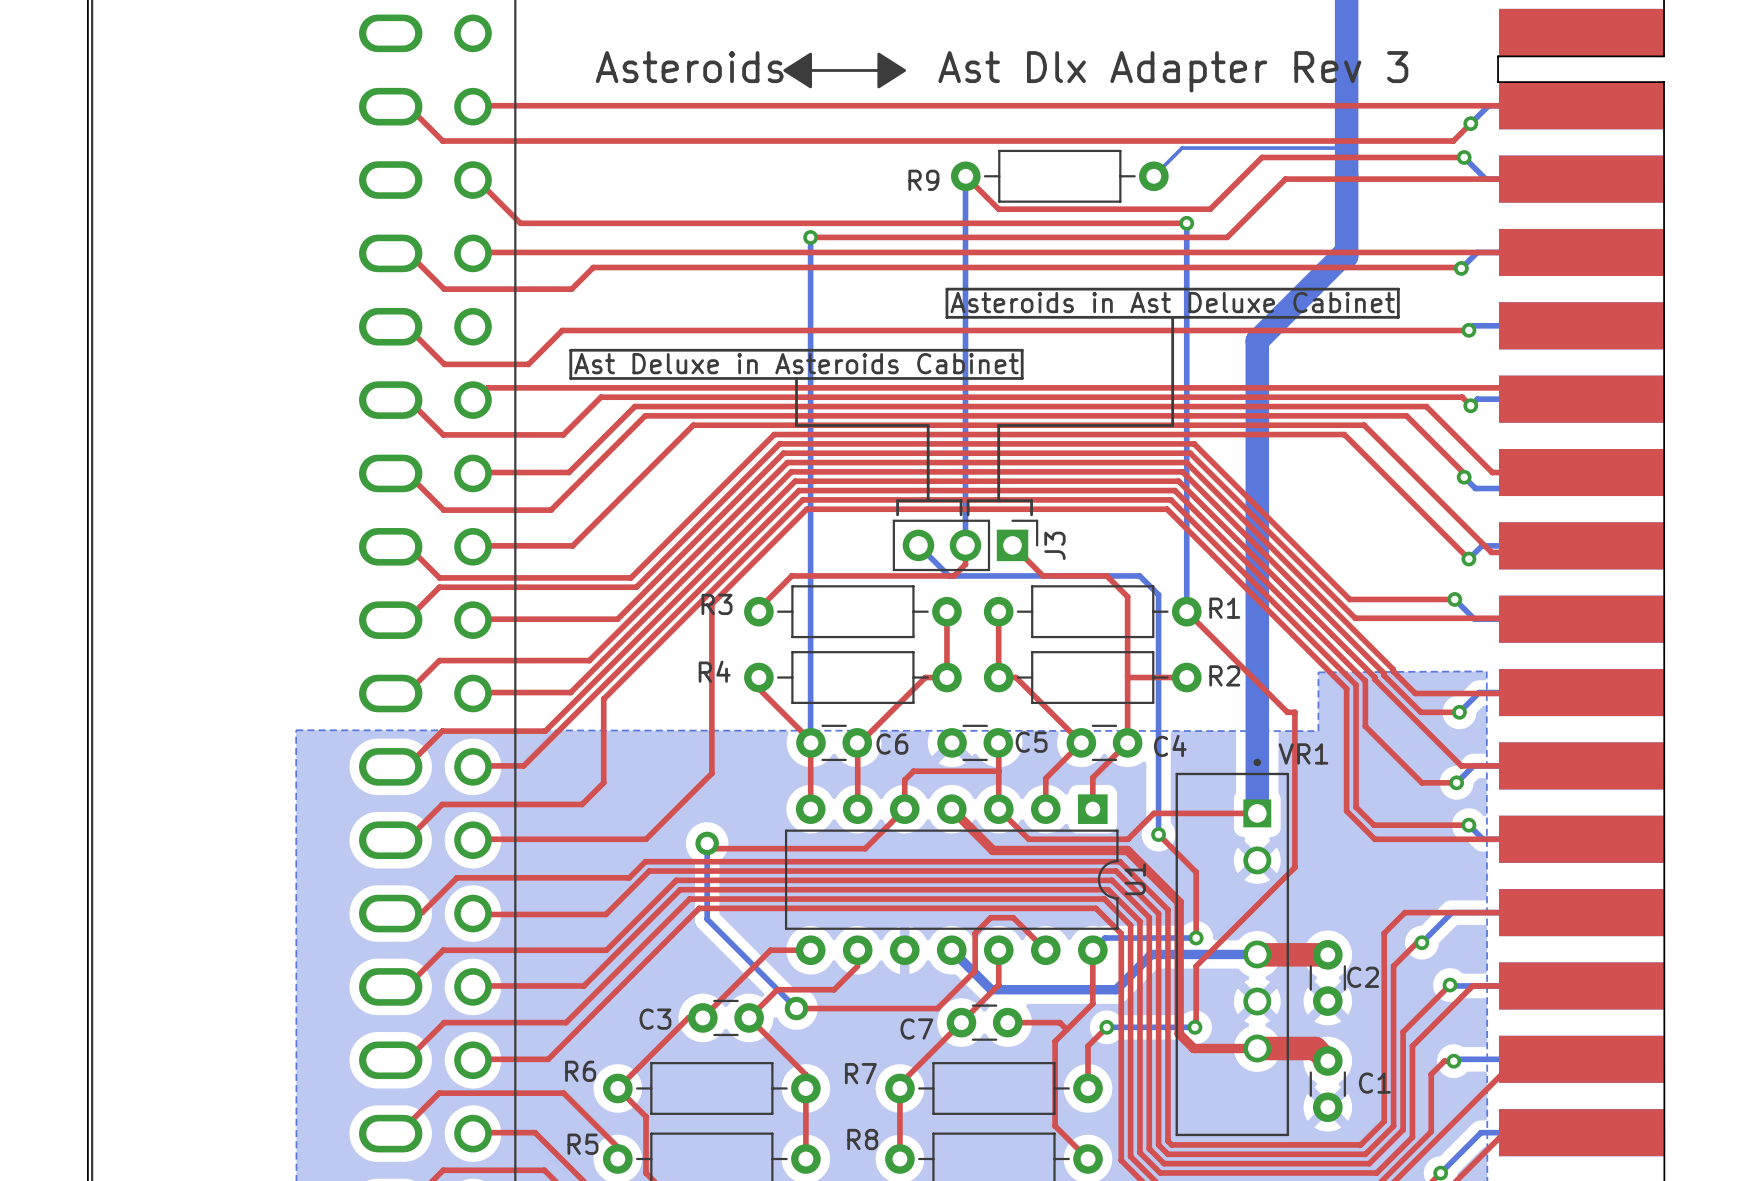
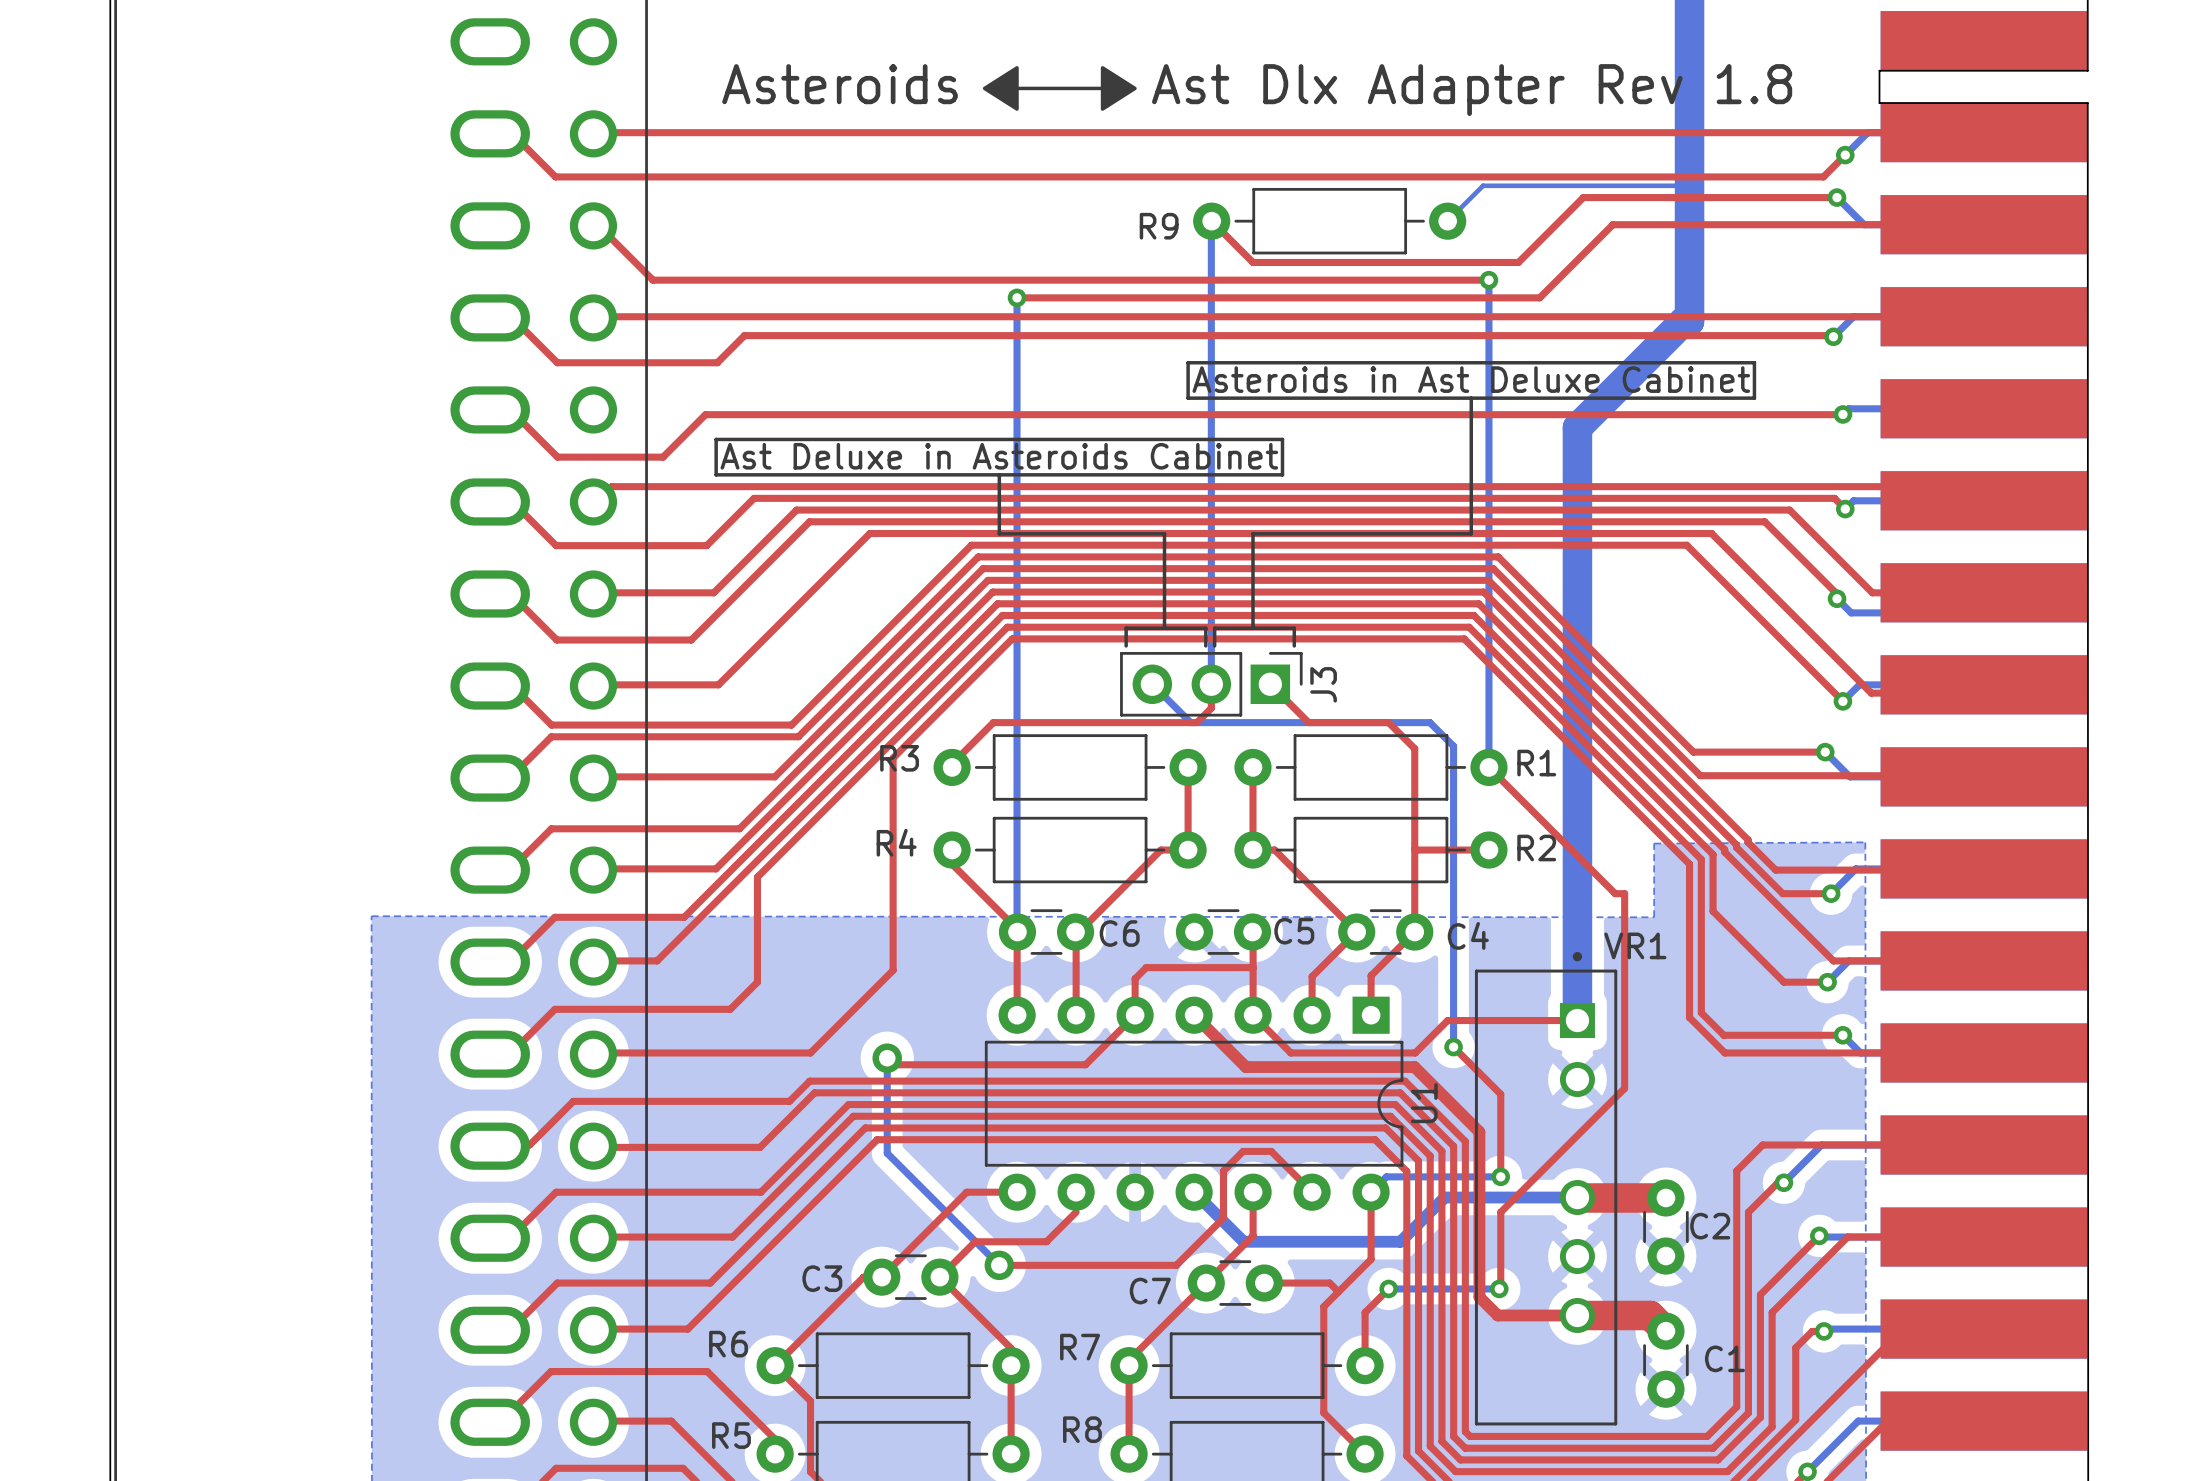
text: Asteroids Ast Dlx Adapter Rev 3 (1002, 71) -> Asteroids Ast Dlx Adapter Rev 1.8 (1257, 90)

